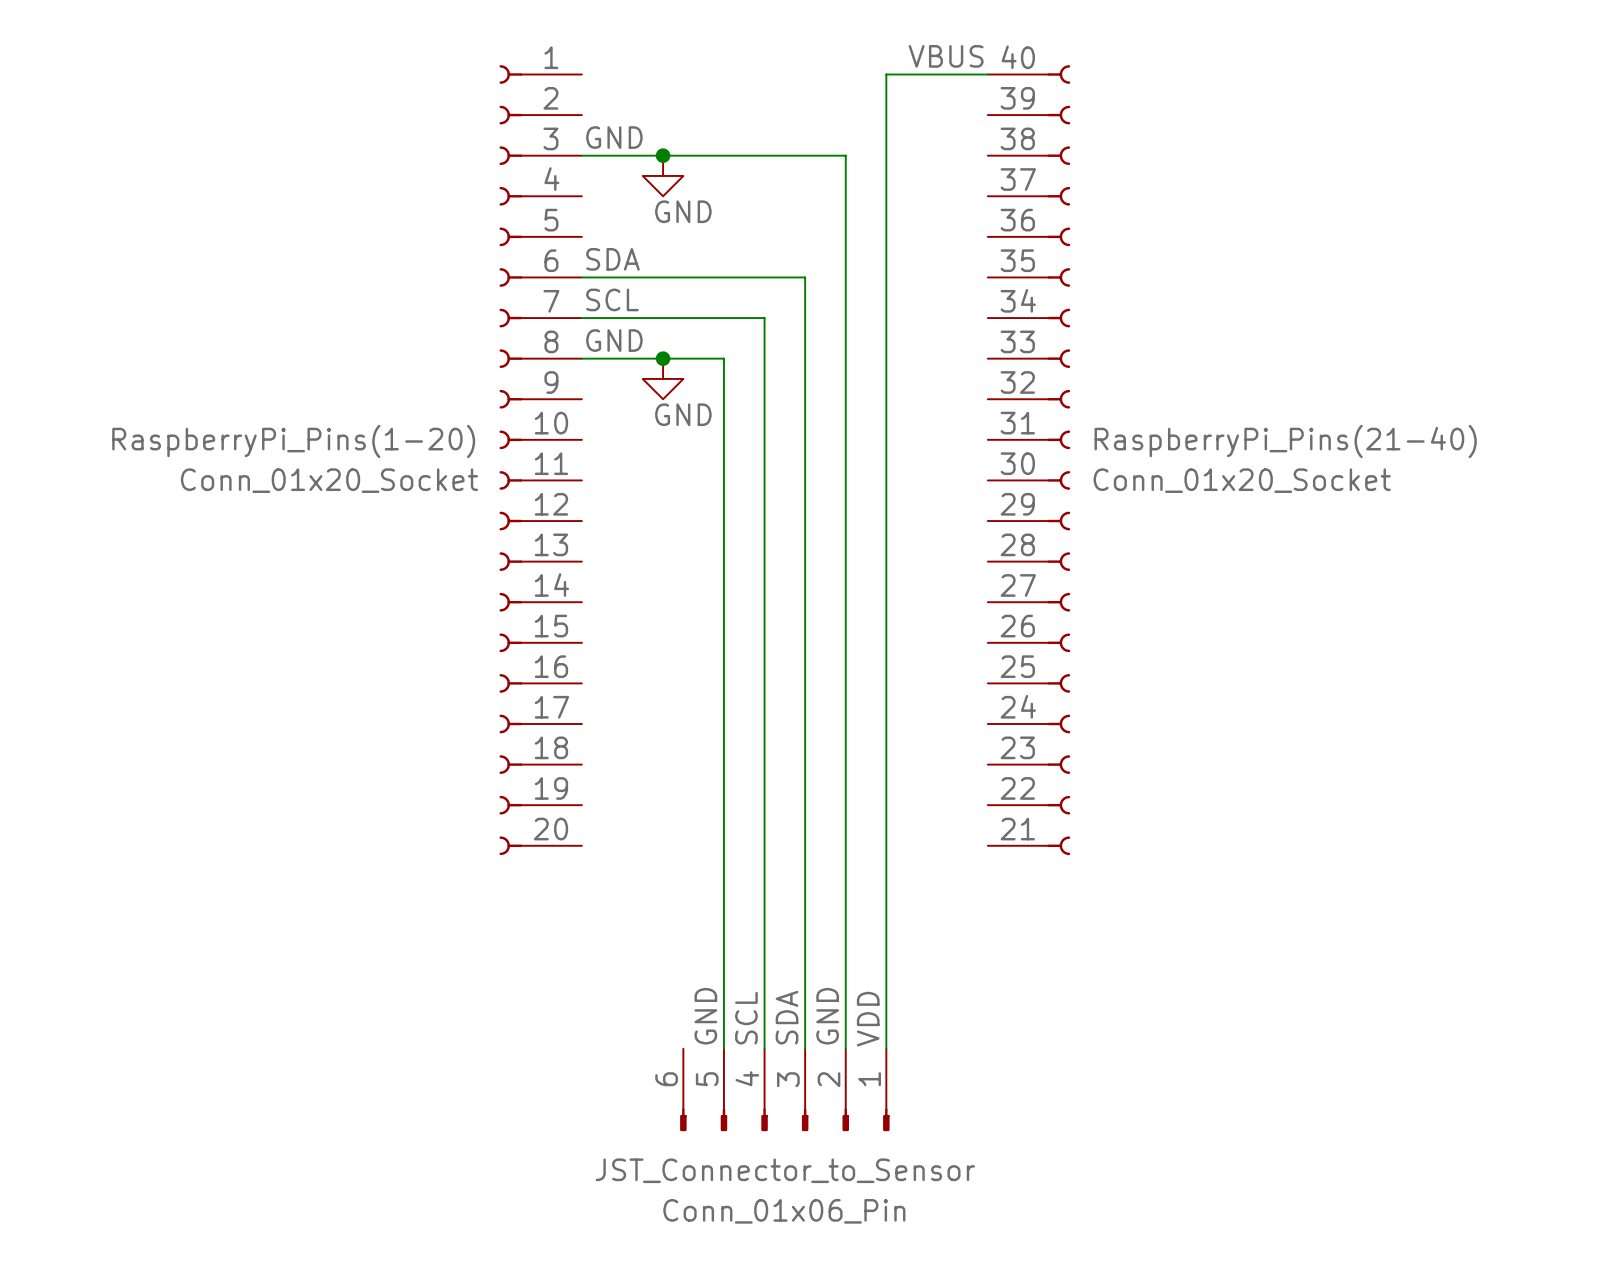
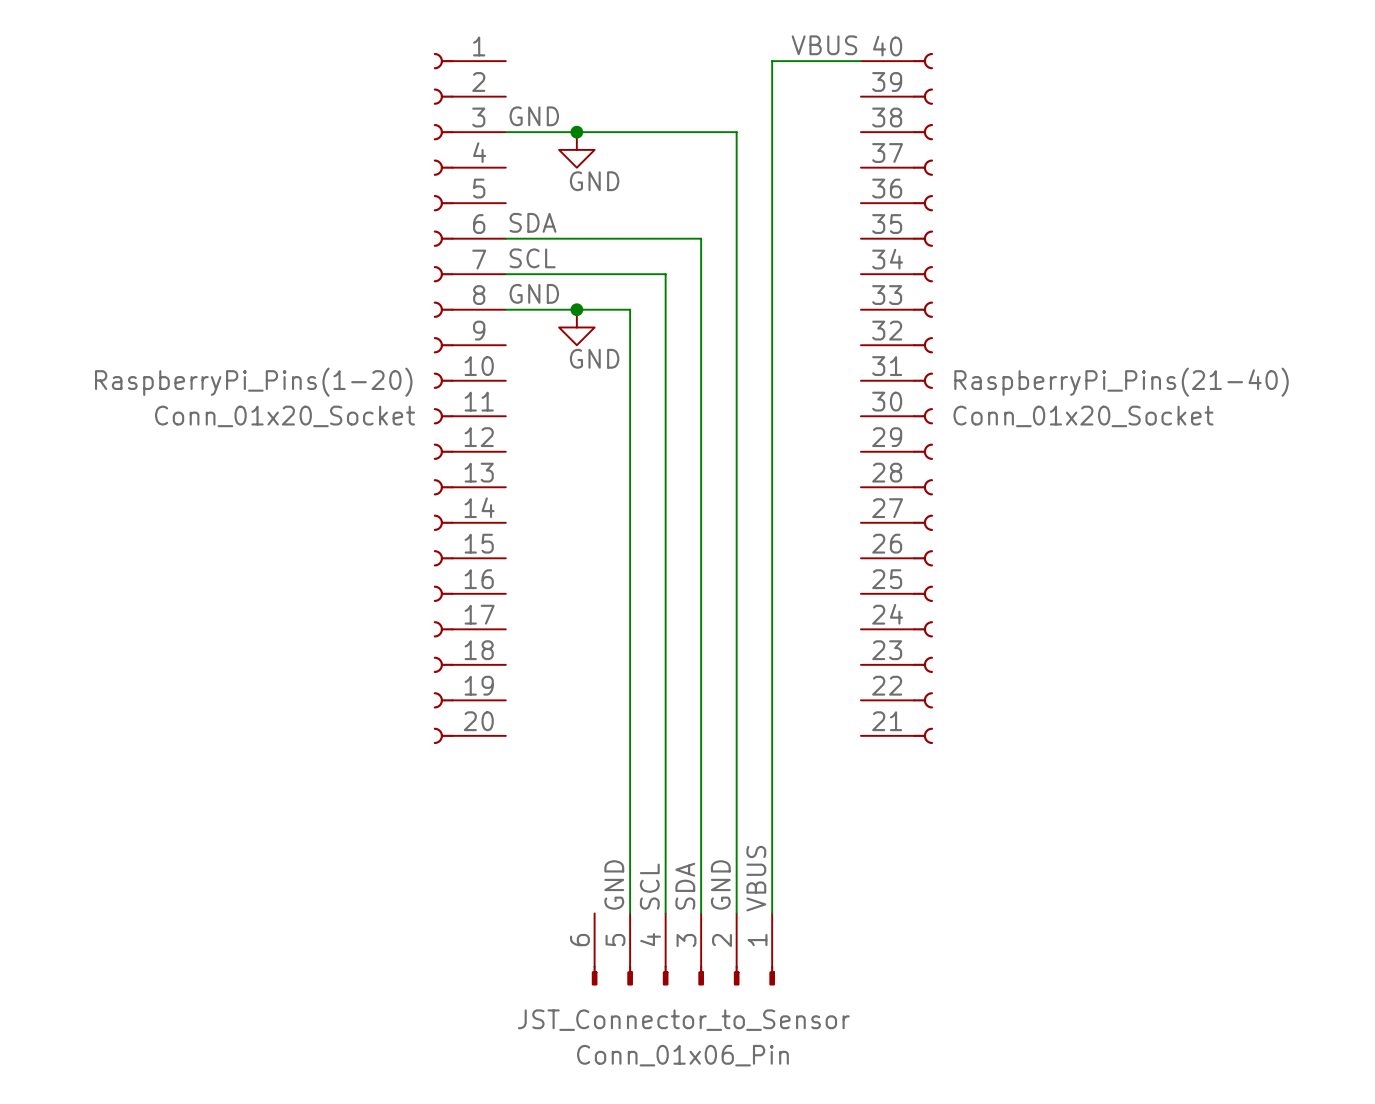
label: VDD (868, 1019) -> VBUS (756, 878)

